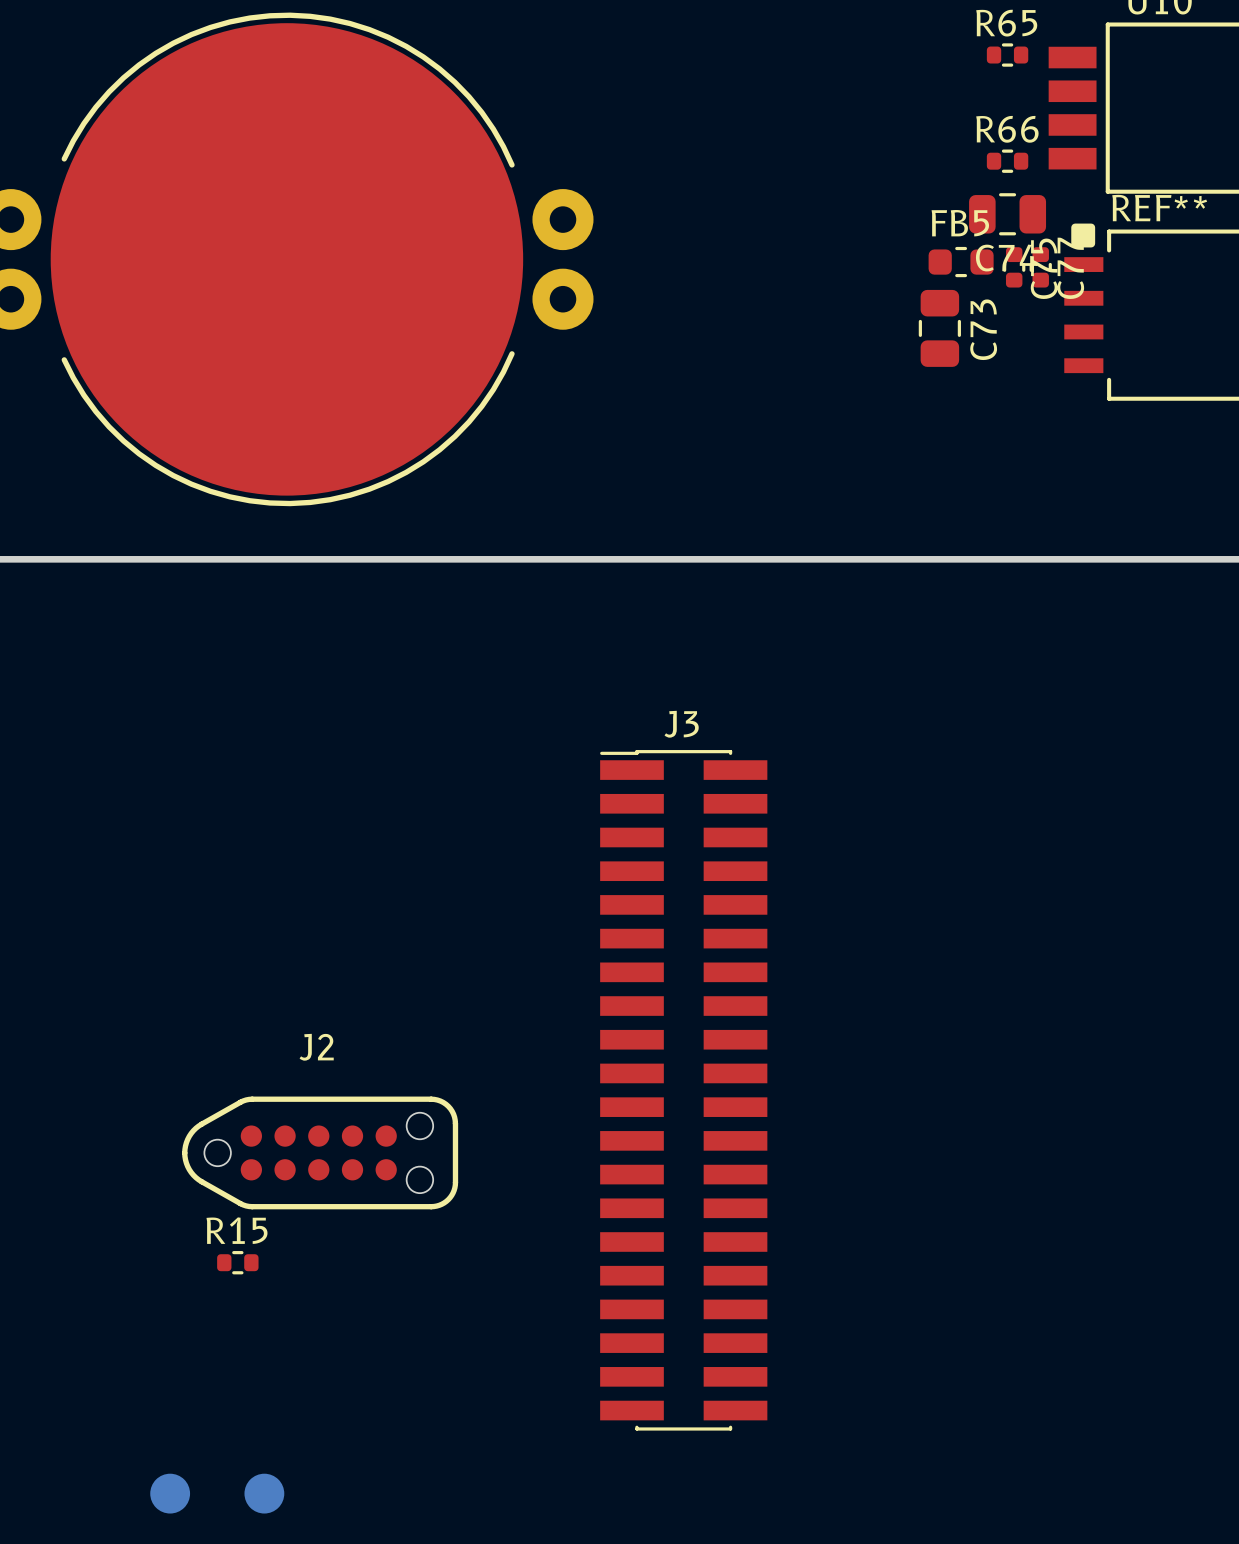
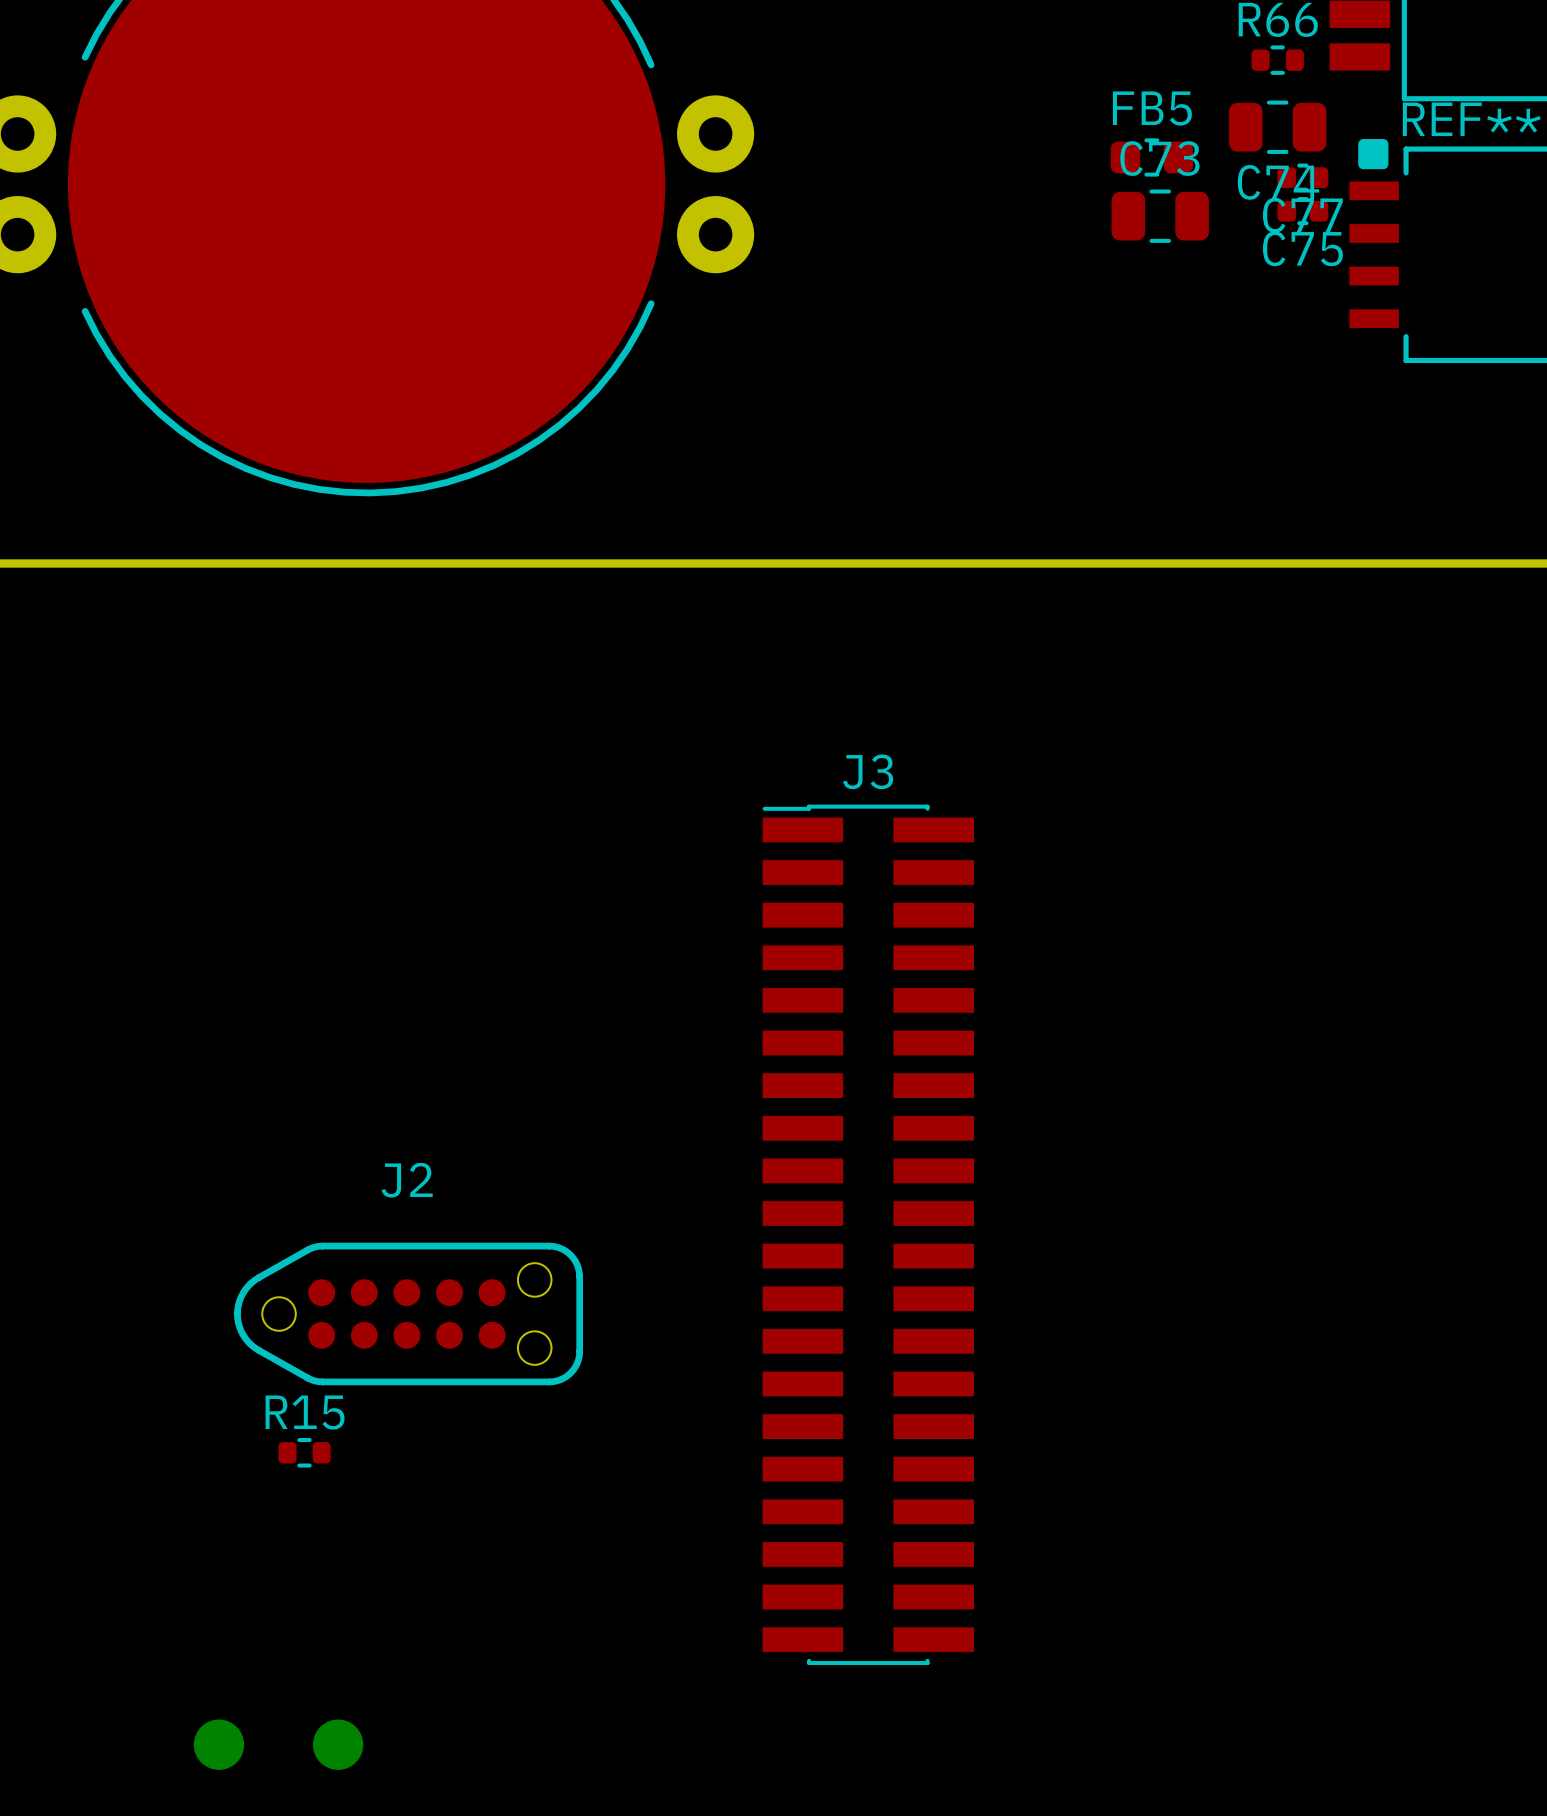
FB5 position: (961, 262) -> (1151, 157)
C75 rotation: 0° (1014, 267) -> 90° clockwise (1302, 211)
C77 rotation: 0° (1040, 267) -> 90° clockwise (1302, 177)
C73 rotation: 0° (939, 328) -> 90° clockwise (1160, 216)
C73 position: (939, 328) -> (1160, 216)
C73 name position: C73 (983, 329) -> C73 (1159, 158)

